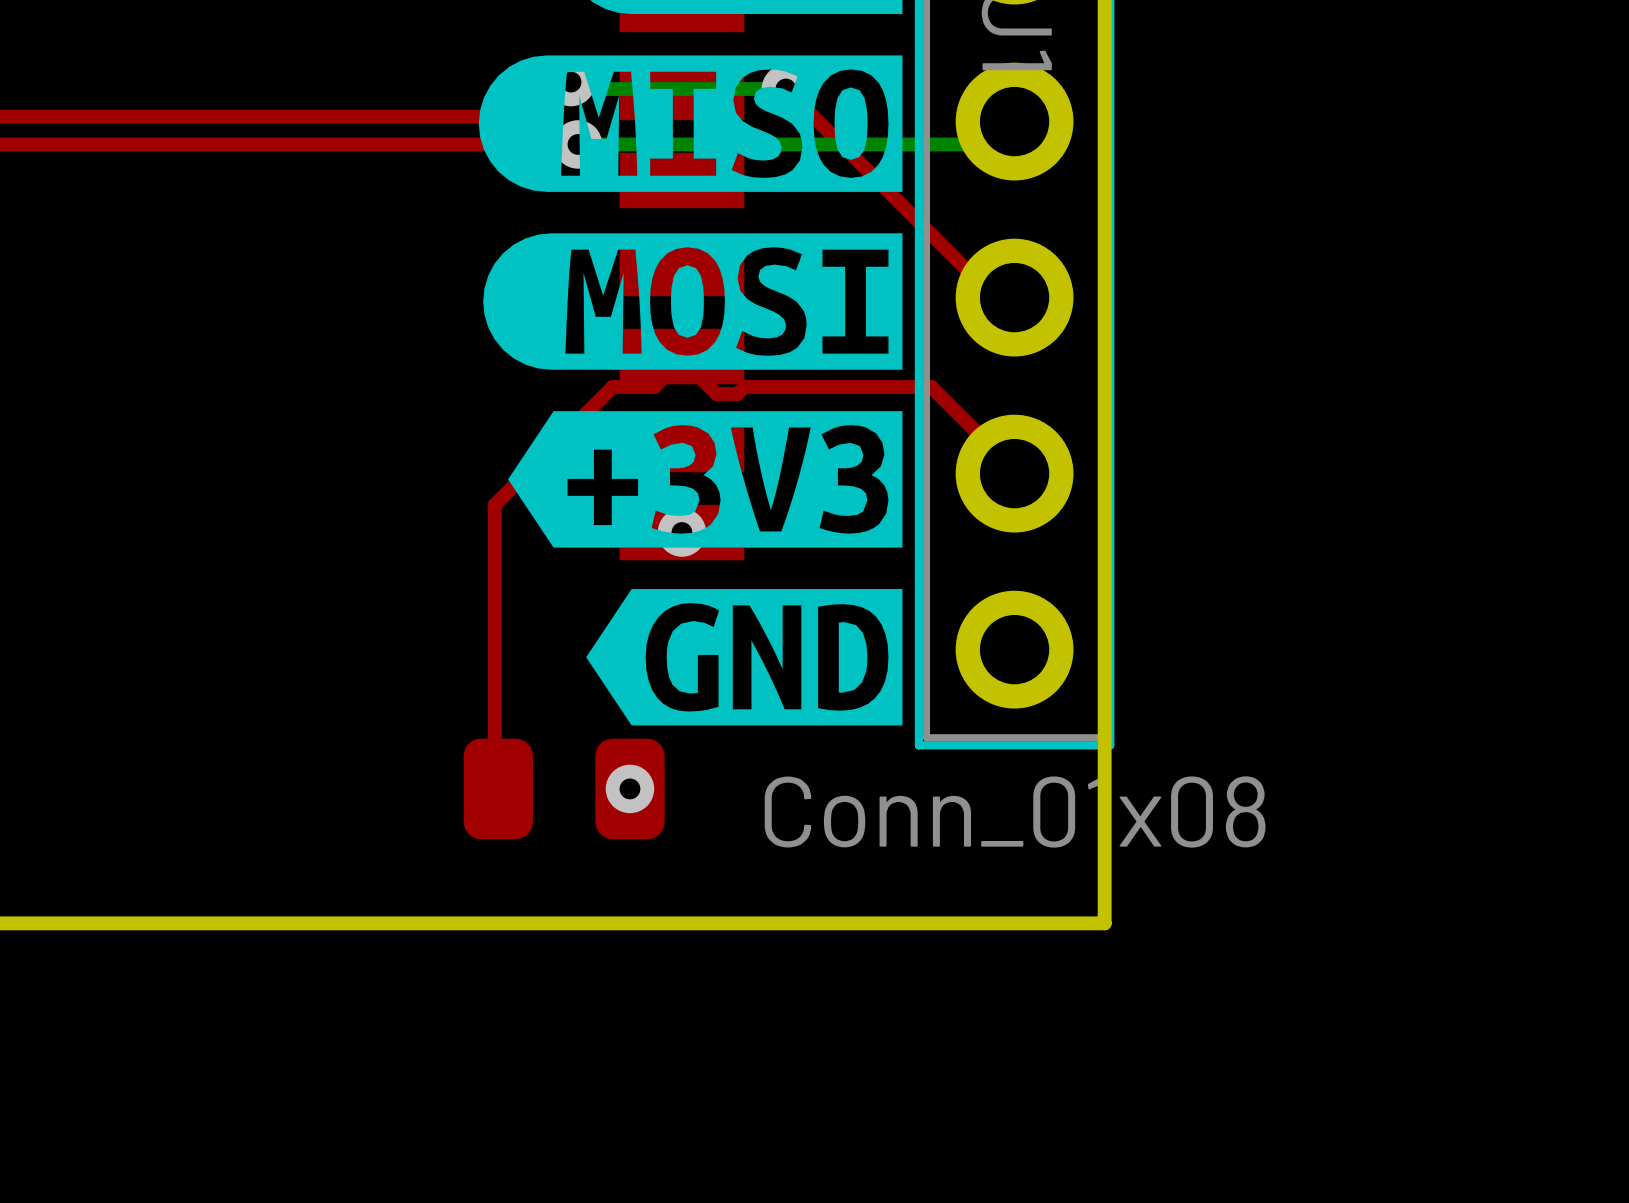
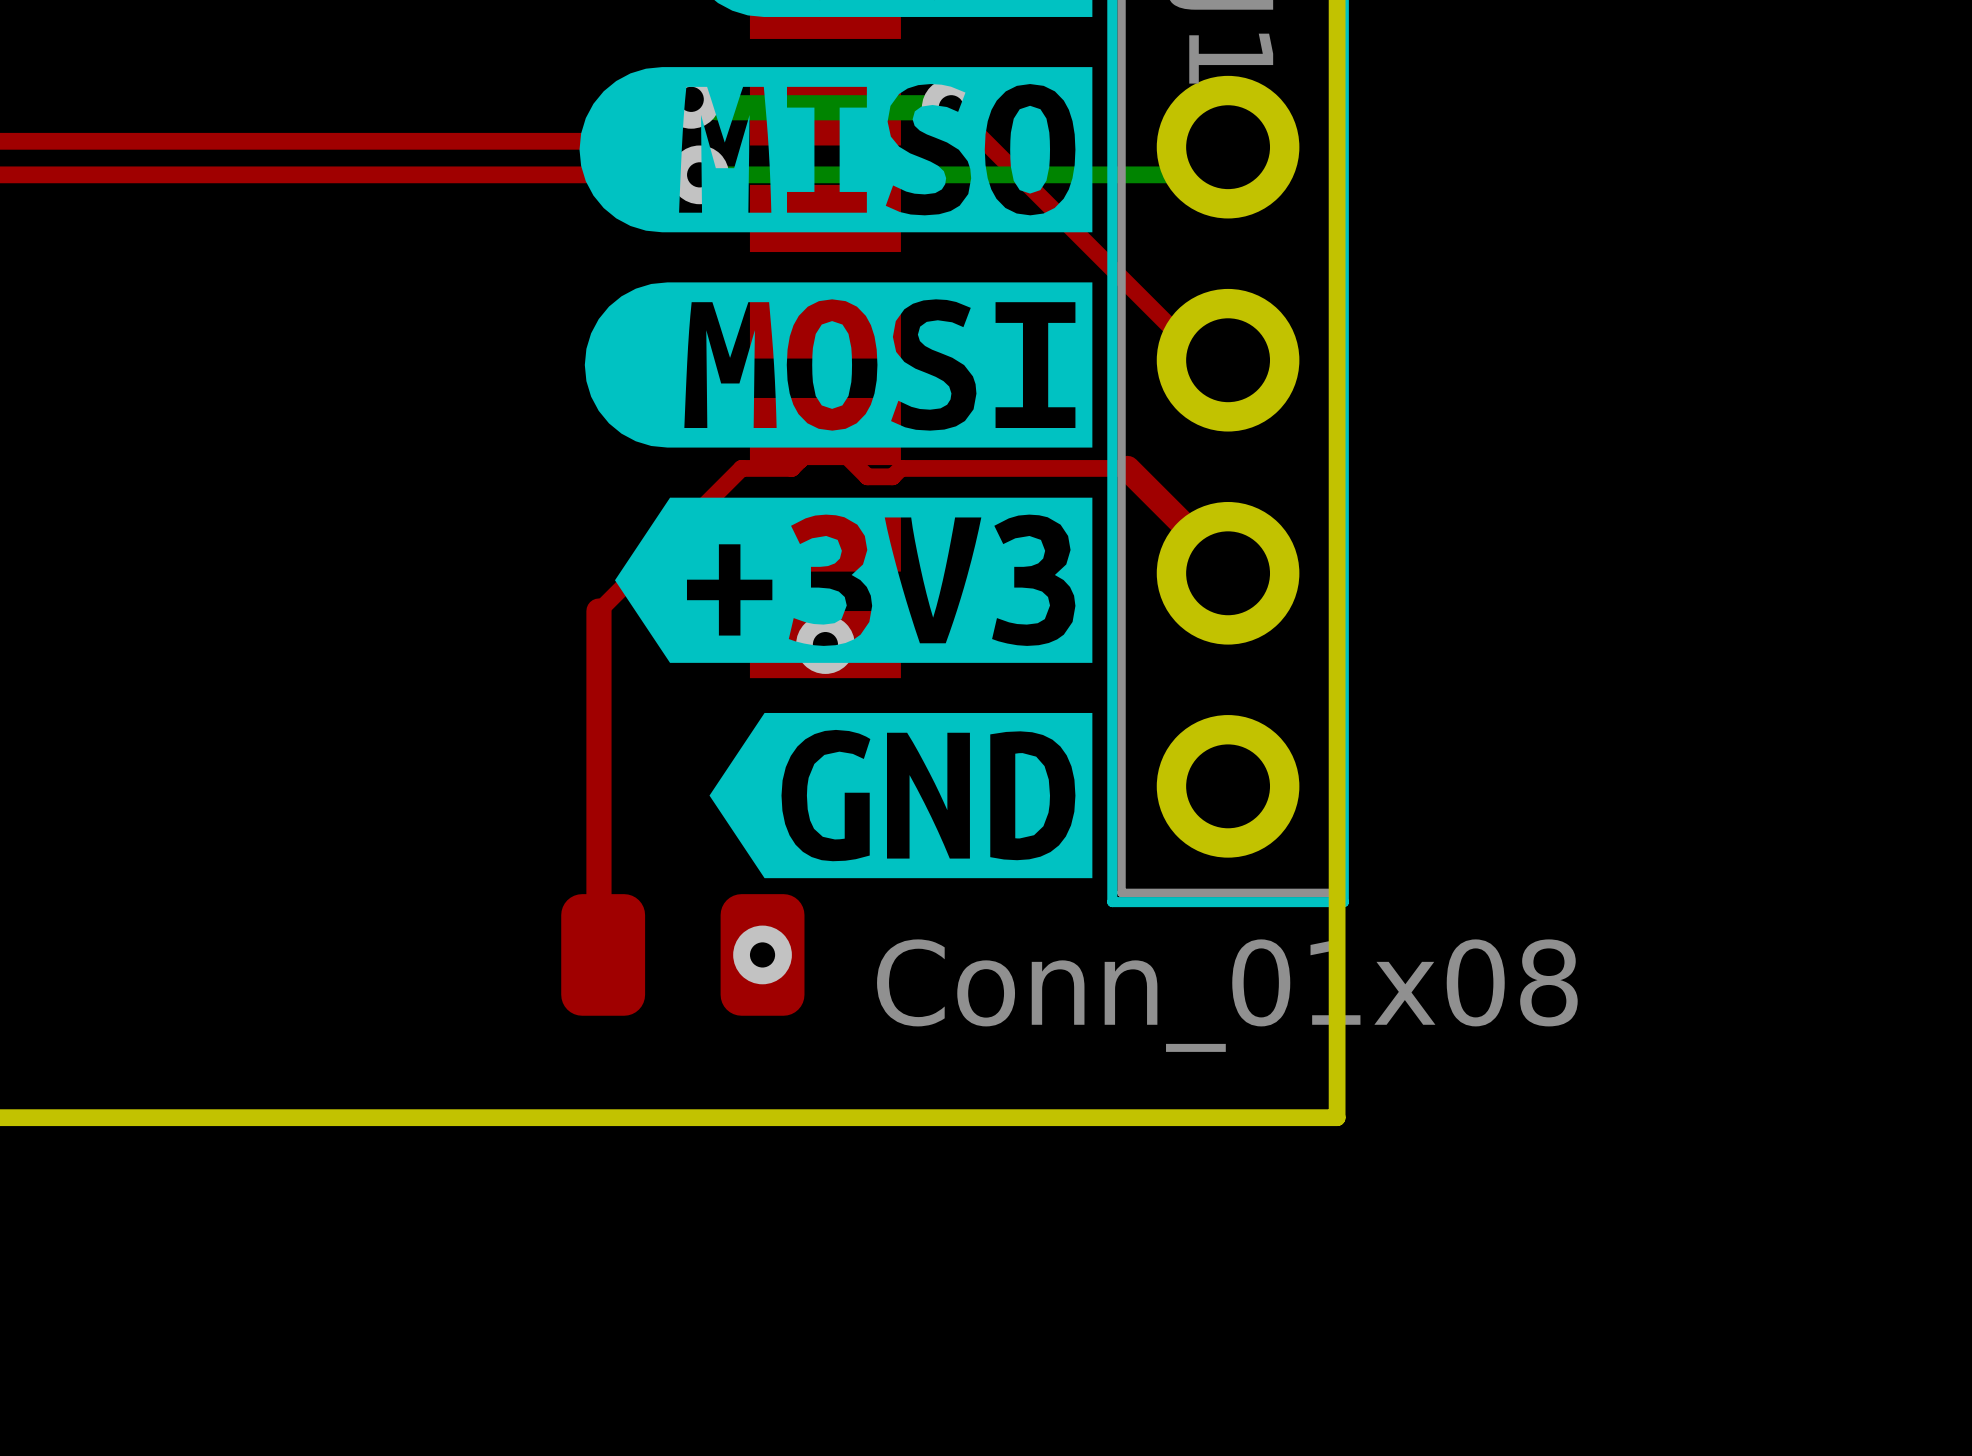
bottom track width: thin (785, 89) (591, 89) -> thick (951, 107) (716, 107)
top track width: thin (931, 386) (1014, 470) -> thick (1127, 468) (1228, 569)
top track width: thin (494, 504) (494, 788) (498, 788) -> thick (598, 611) (598, 954) (603, 954)

